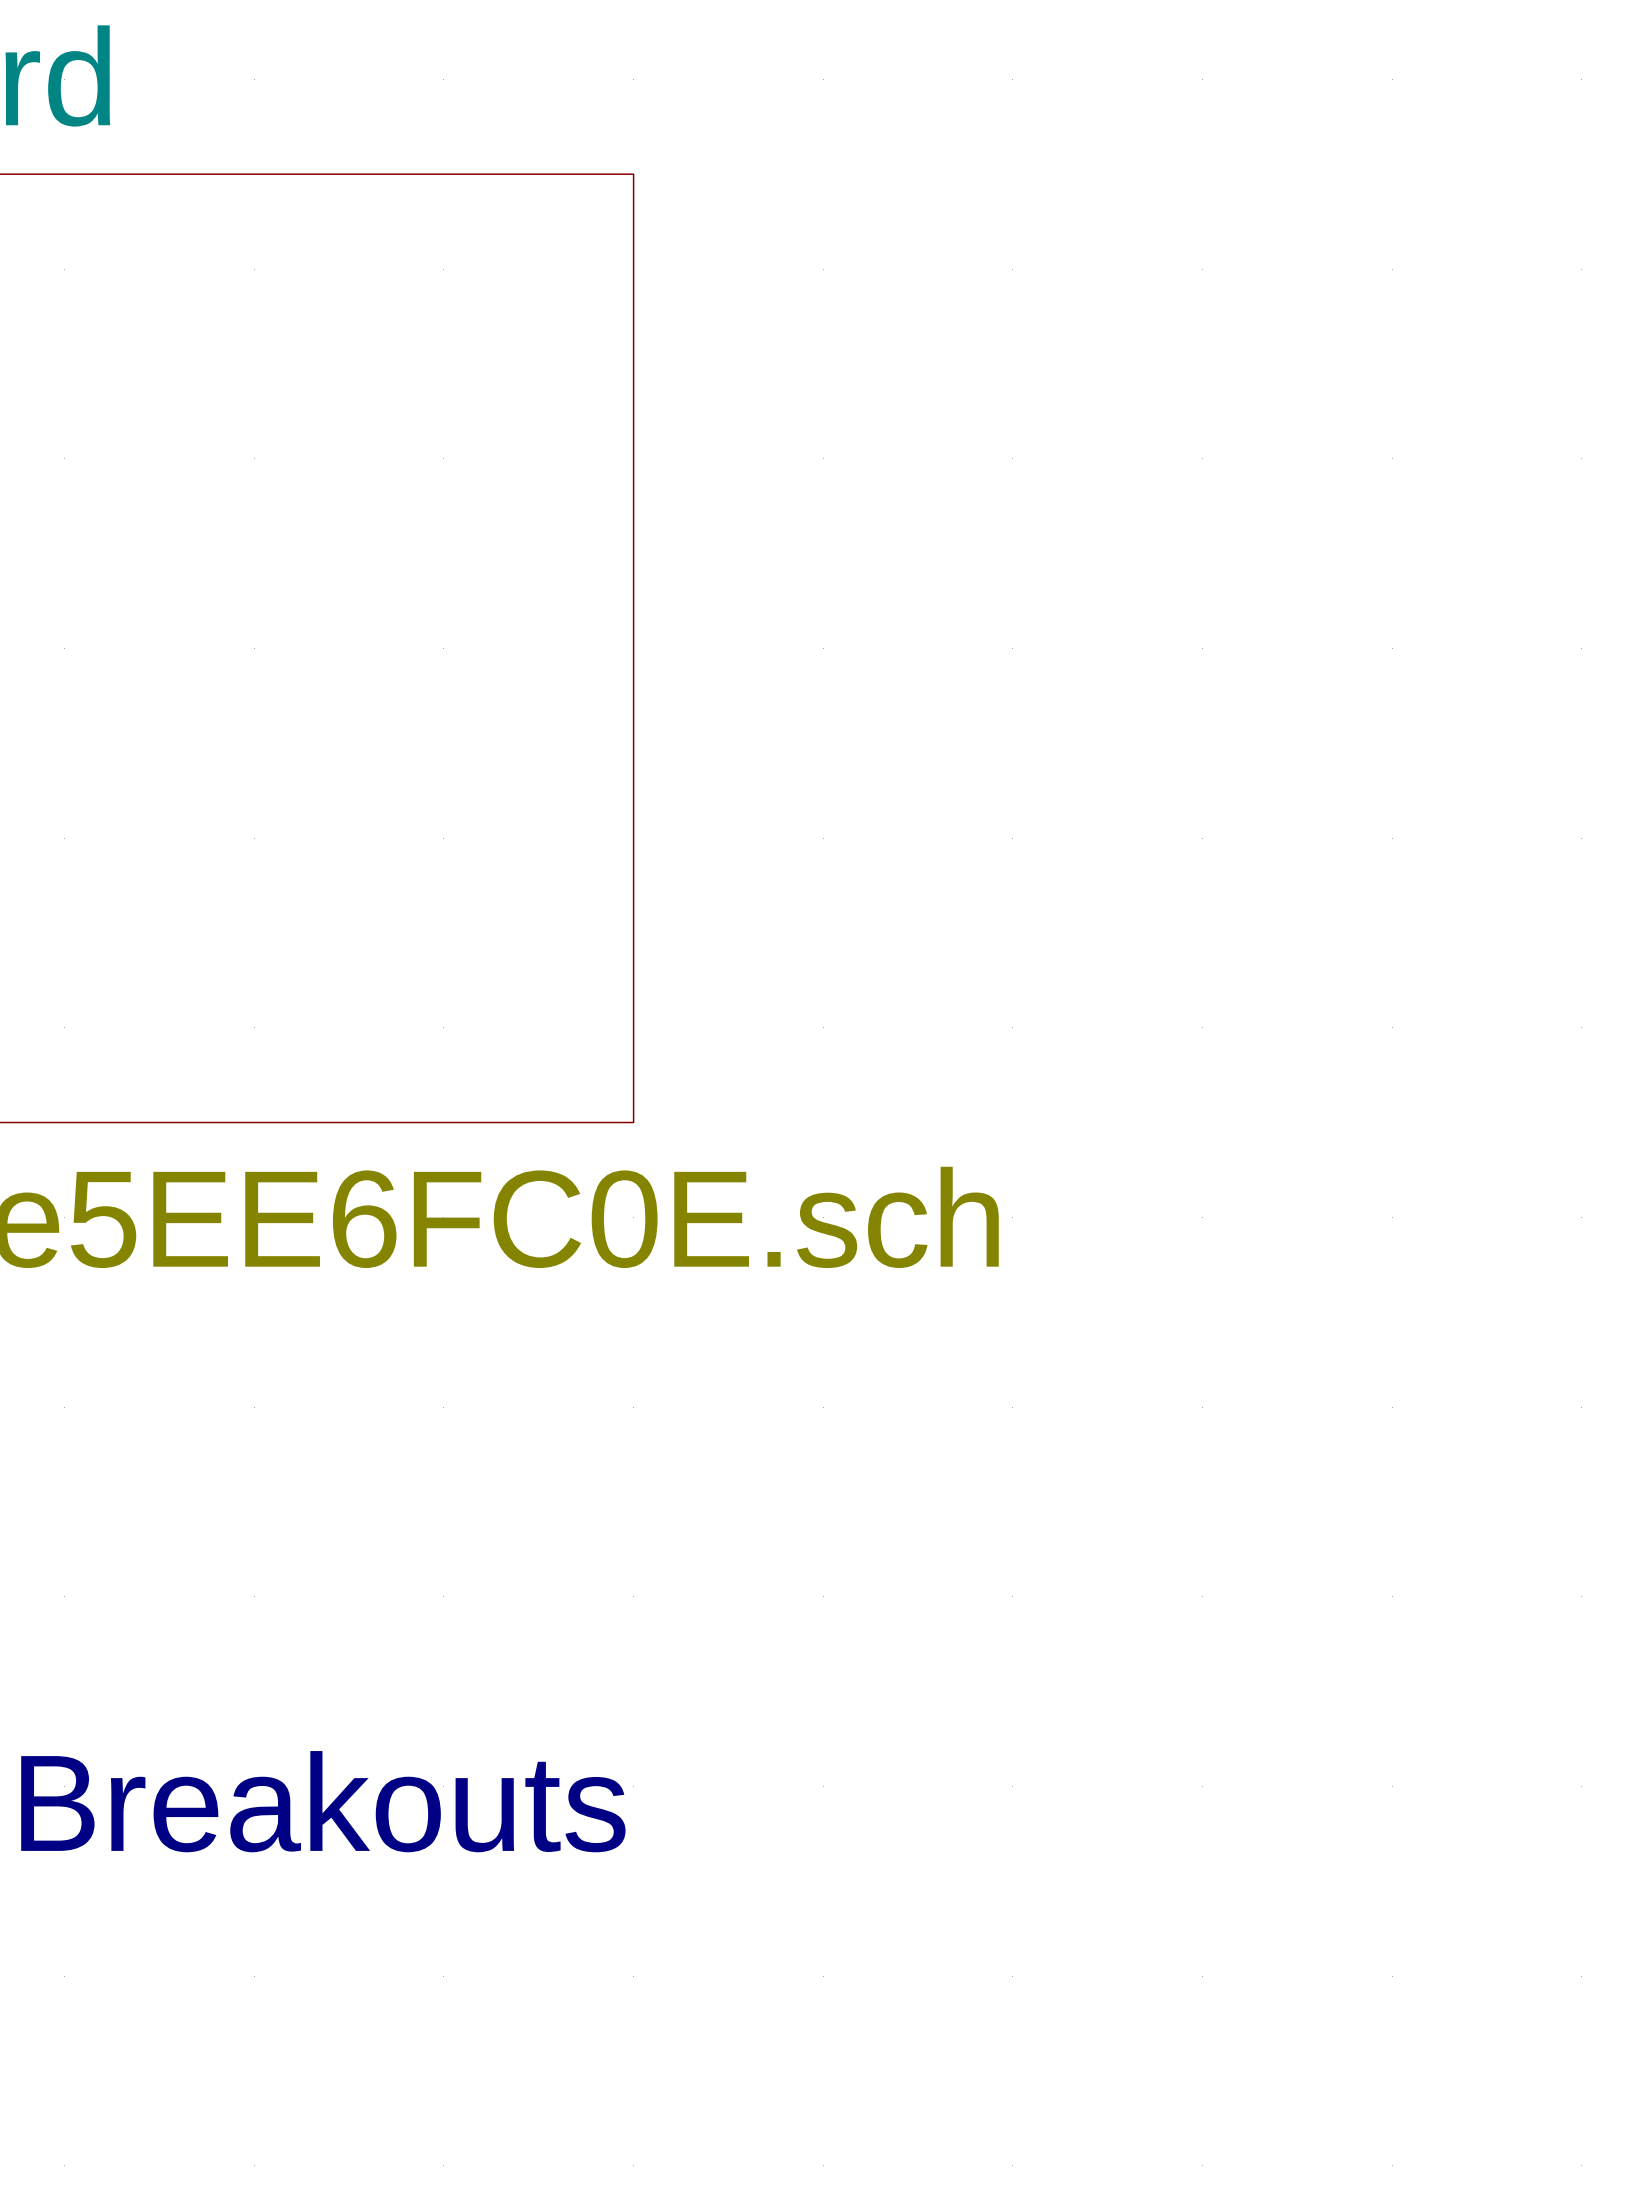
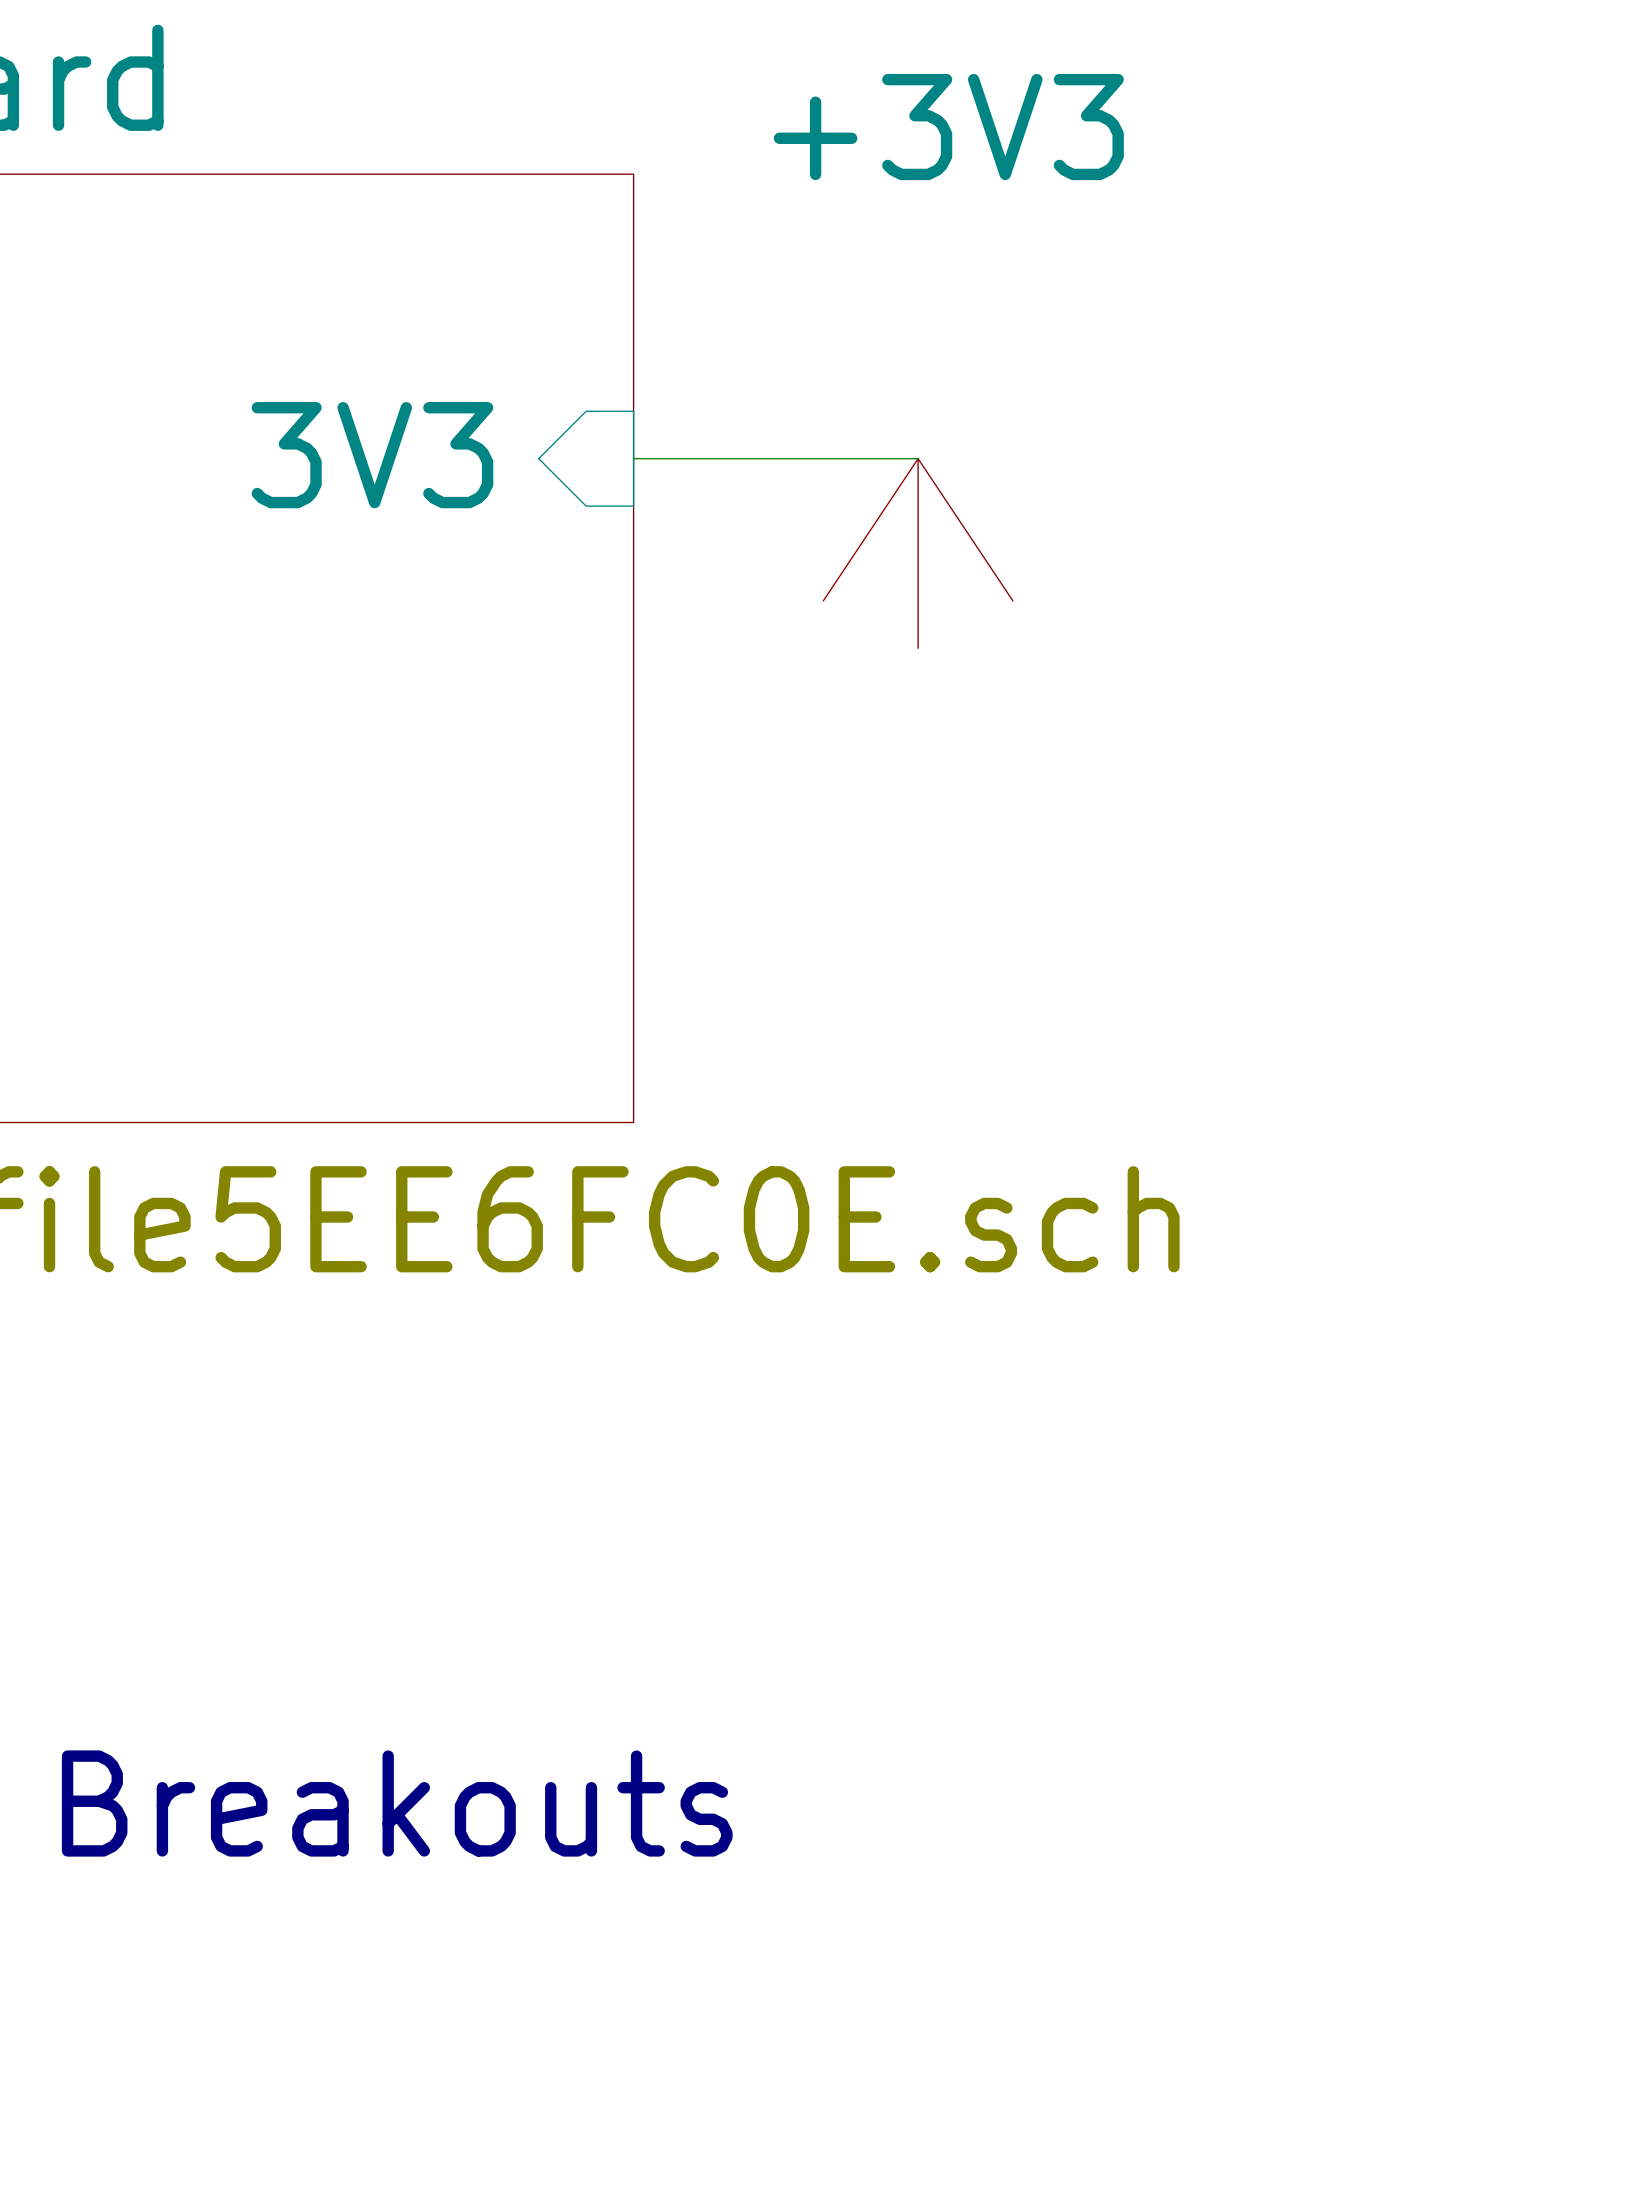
sheet pin: none -> 3V3 (372, 455)
wire: none -> (633, 458) (918, 458)
power symbol: none -> +3V3 (918, 553)

